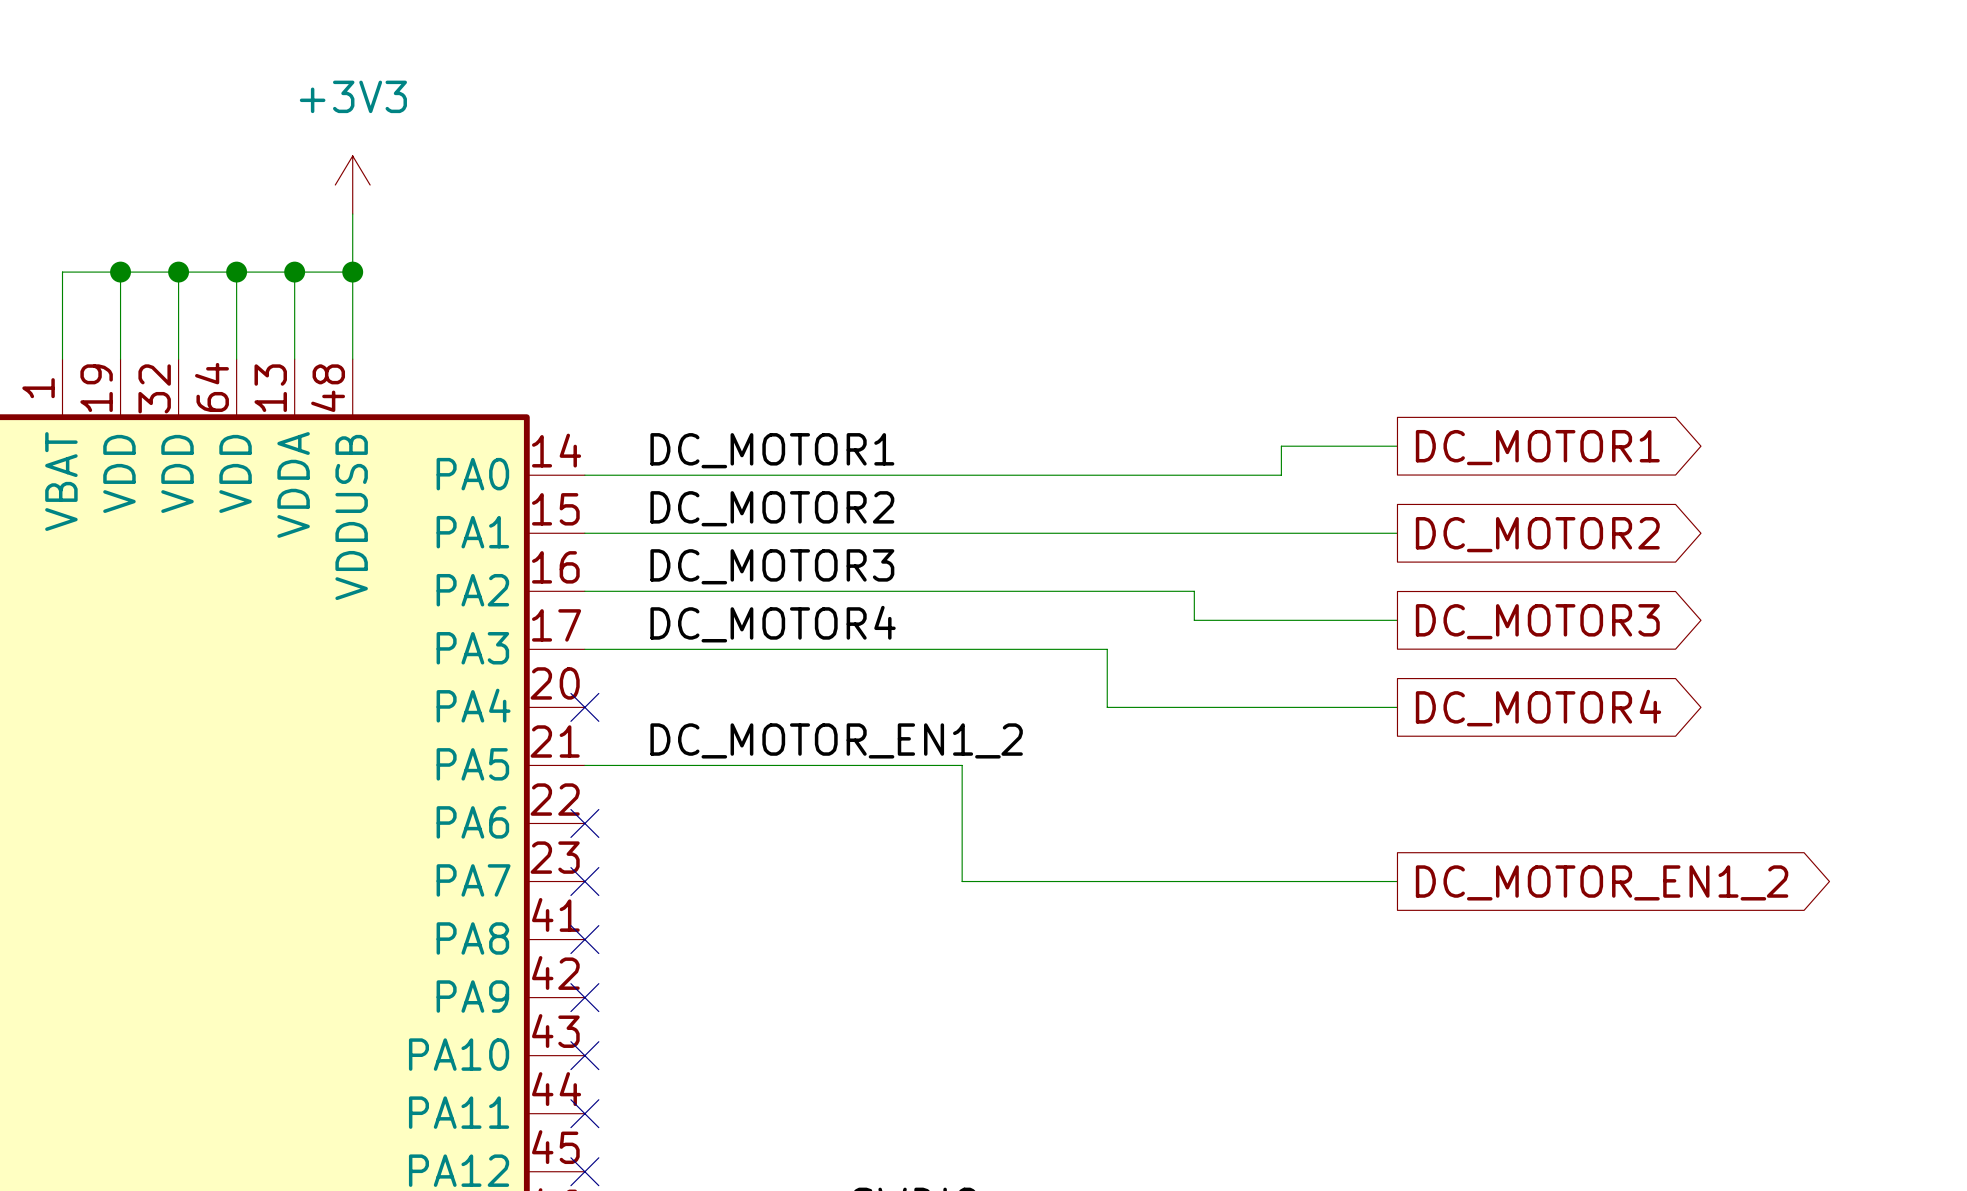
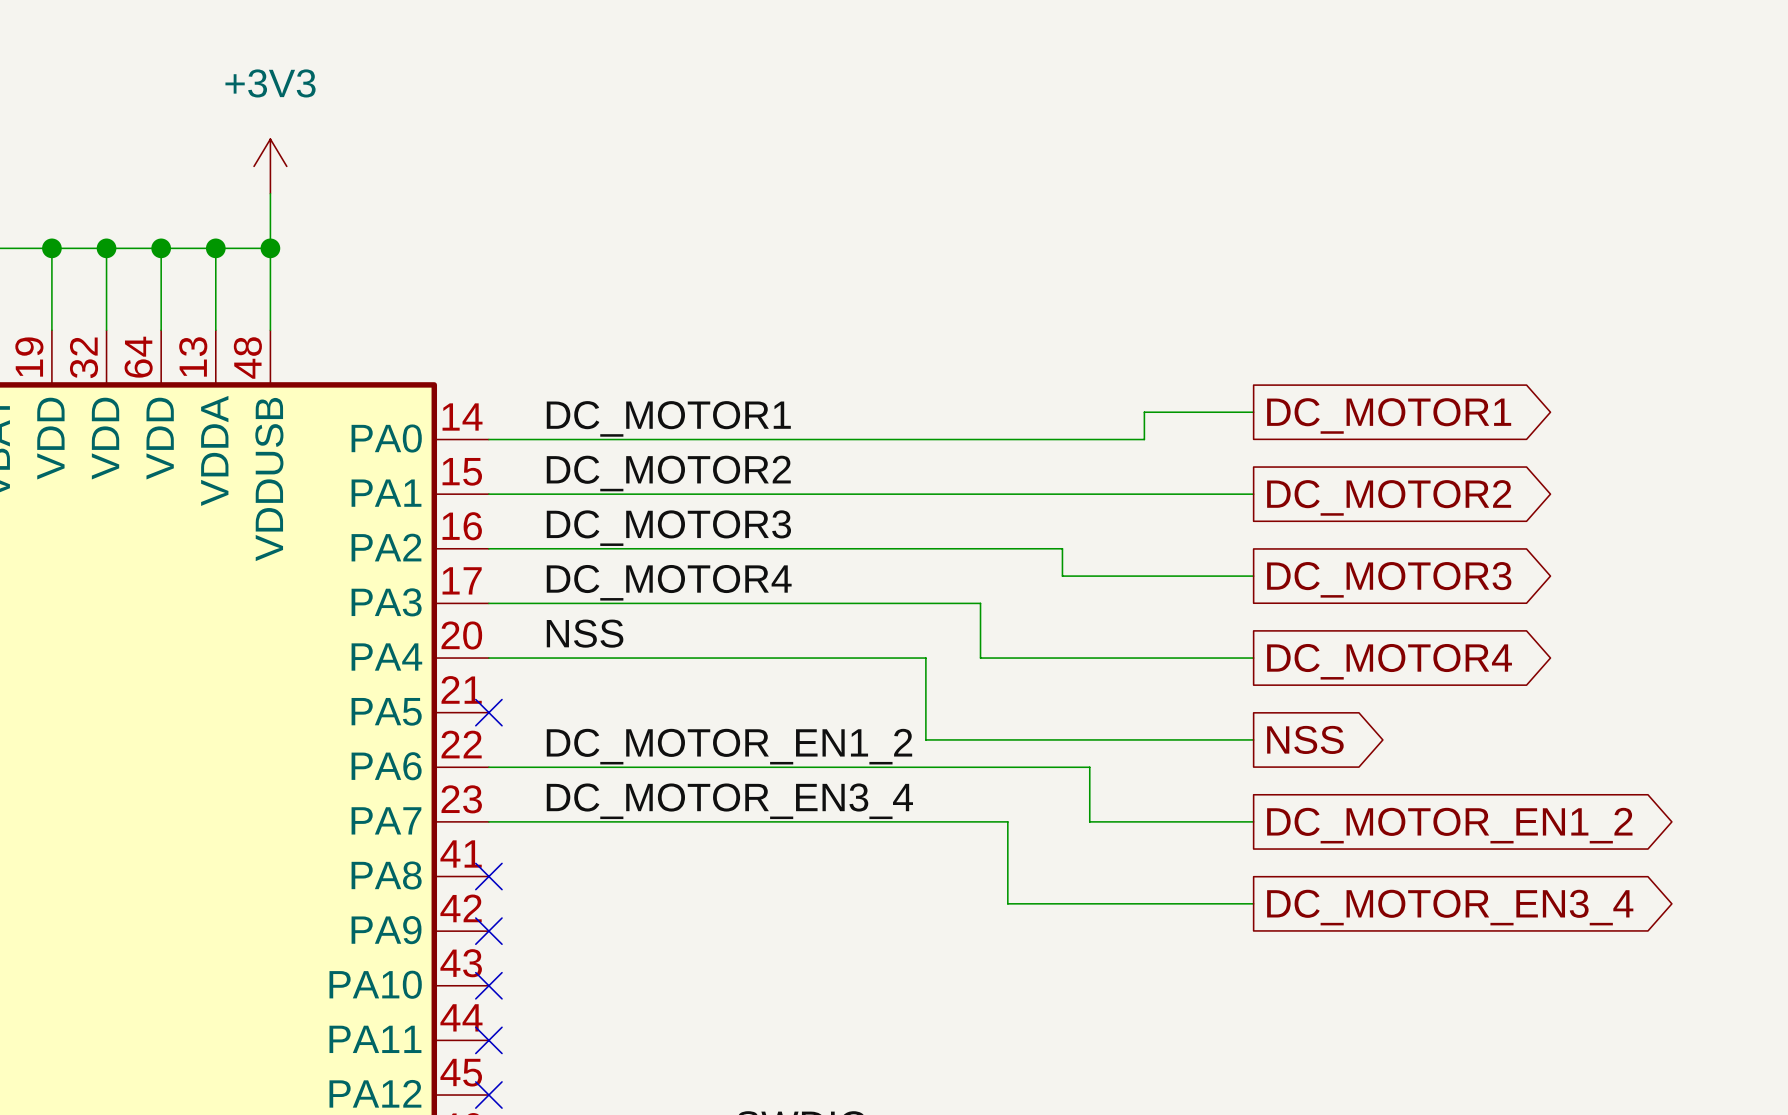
label: none -> NSS (585, 633)
wire: none -> (488, 658) (925, 658) (925, 739) (1253, 739)
no-connect mark: (584, 707) -> none
label position: DC_MOTOR_EN1_2 (836, 740) -> DC_MOTOR_EN1_2 (729, 746)
wire: (584, 765) (962, 765) (962, 881) -> (488, 821) (843, 821)
no-connect mark: none -> (488, 712)
global label: none -> NSS (1305, 739)
wire: none -> (488, 767) (1089, 767) (1089, 821)
no-connect mark: (584, 823) -> none
label: none -> DC_MOTOR_EN3_4 (729, 801)
no-connect mark: (584, 881) -> none
wire: (1136, 881) (1223, 881) -> (1007, 821) (1007, 903) (1253, 903)
global label: none -> DC_MOTOR_EN3_4 (1450, 907)

